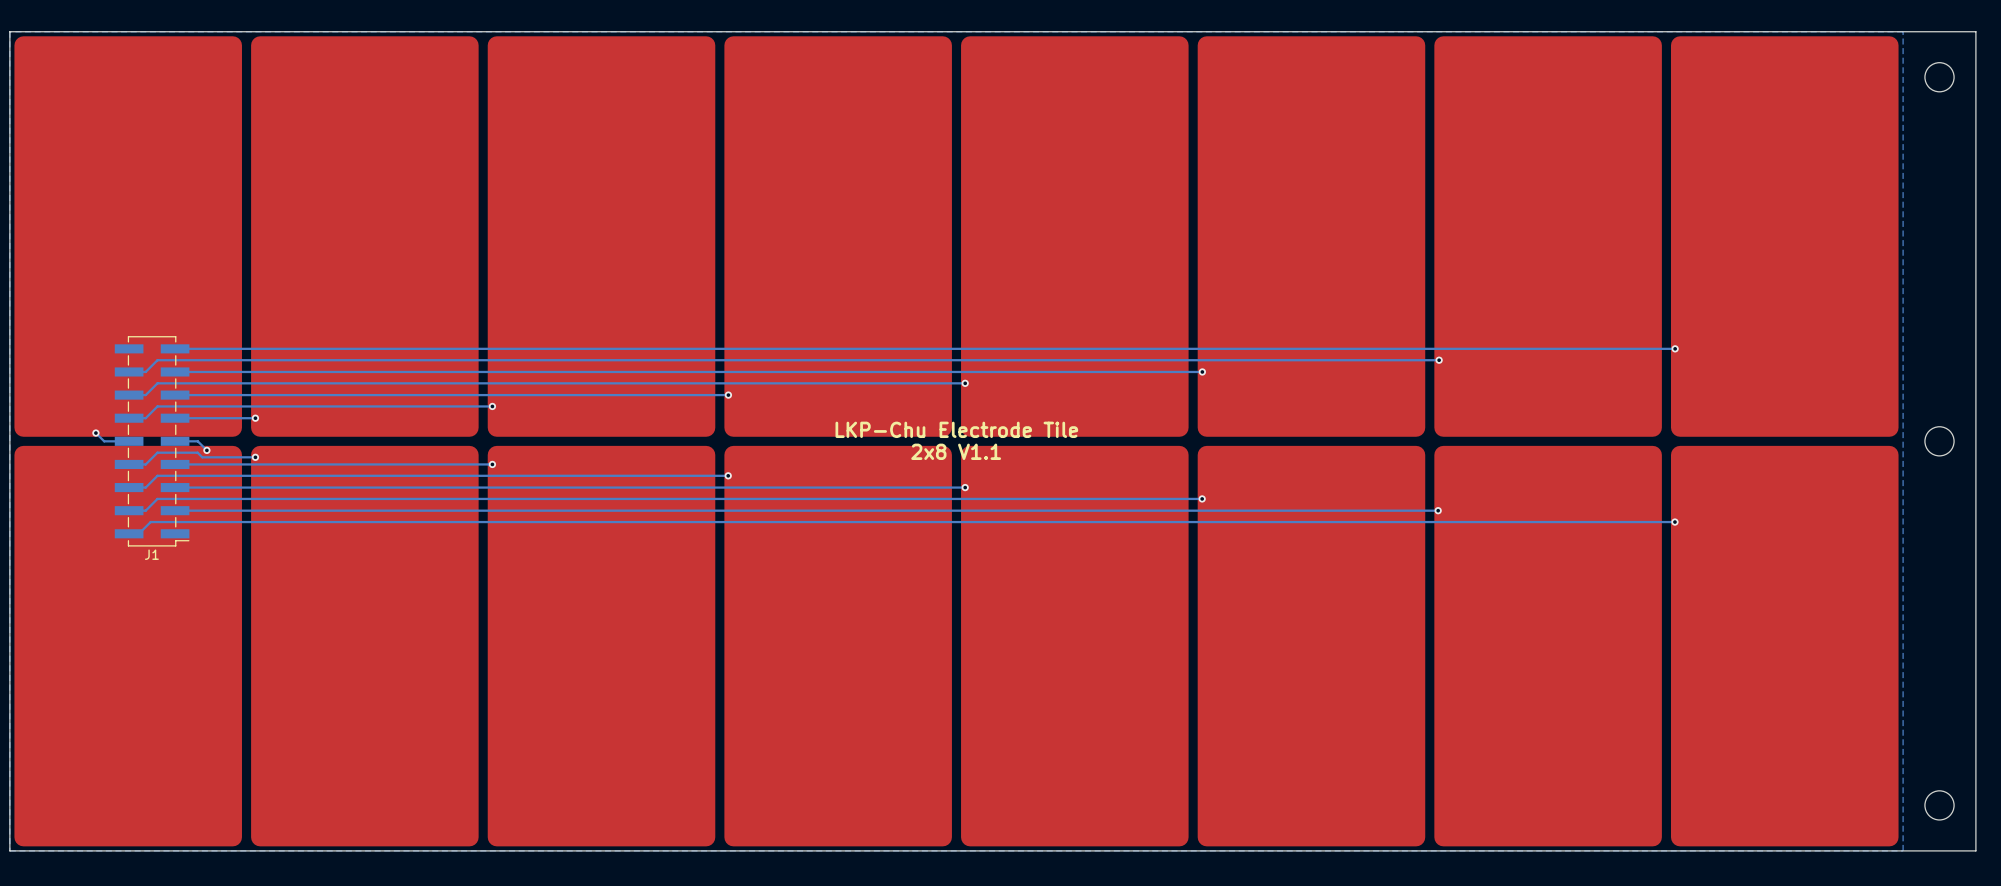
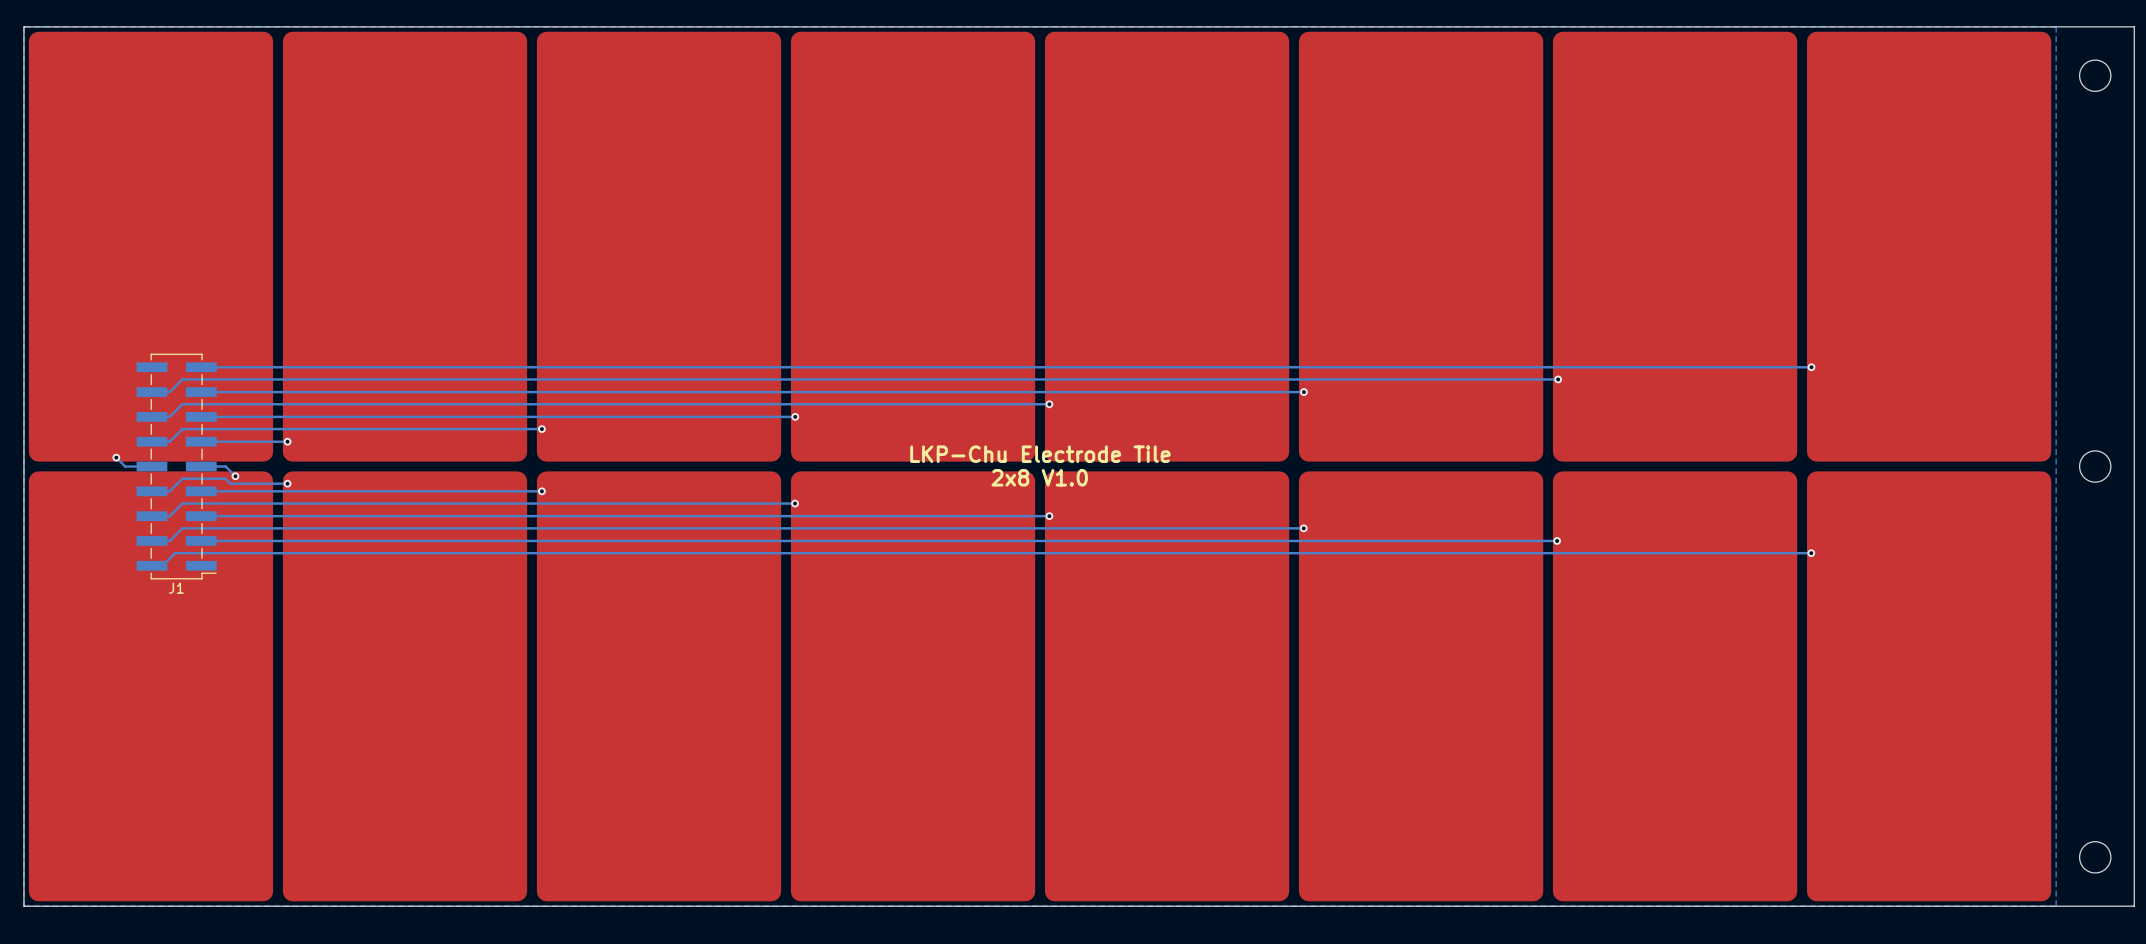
text: 2x8 V1.1 (956, 451) -> 2x8 V1.0 (1039, 477)

